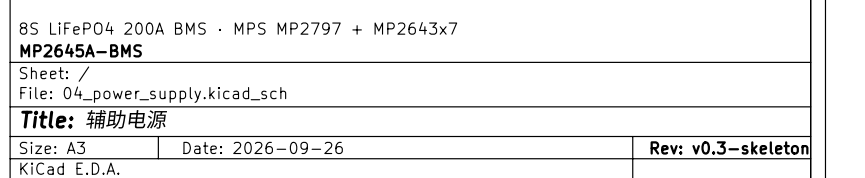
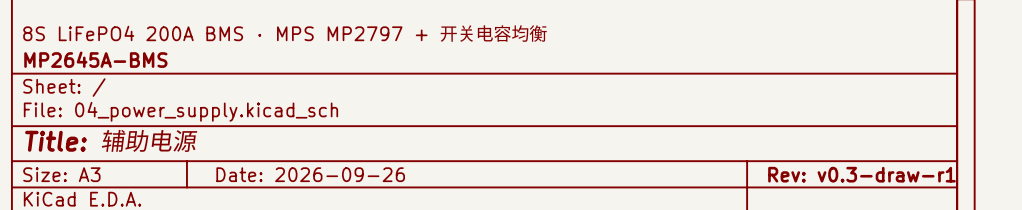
title block: 8S LiFePO4 200A BMS · MPS MP2797 + MP2643x7 (238, 28) -> 8S LiFePO4 200A BMS · MPS MP2797 + 开关电容均衡 (285, 33)
title block: Rev: v0.3-skeleton (729, 147) -> Rev: v0.3-draw-r1 (861, 174)

